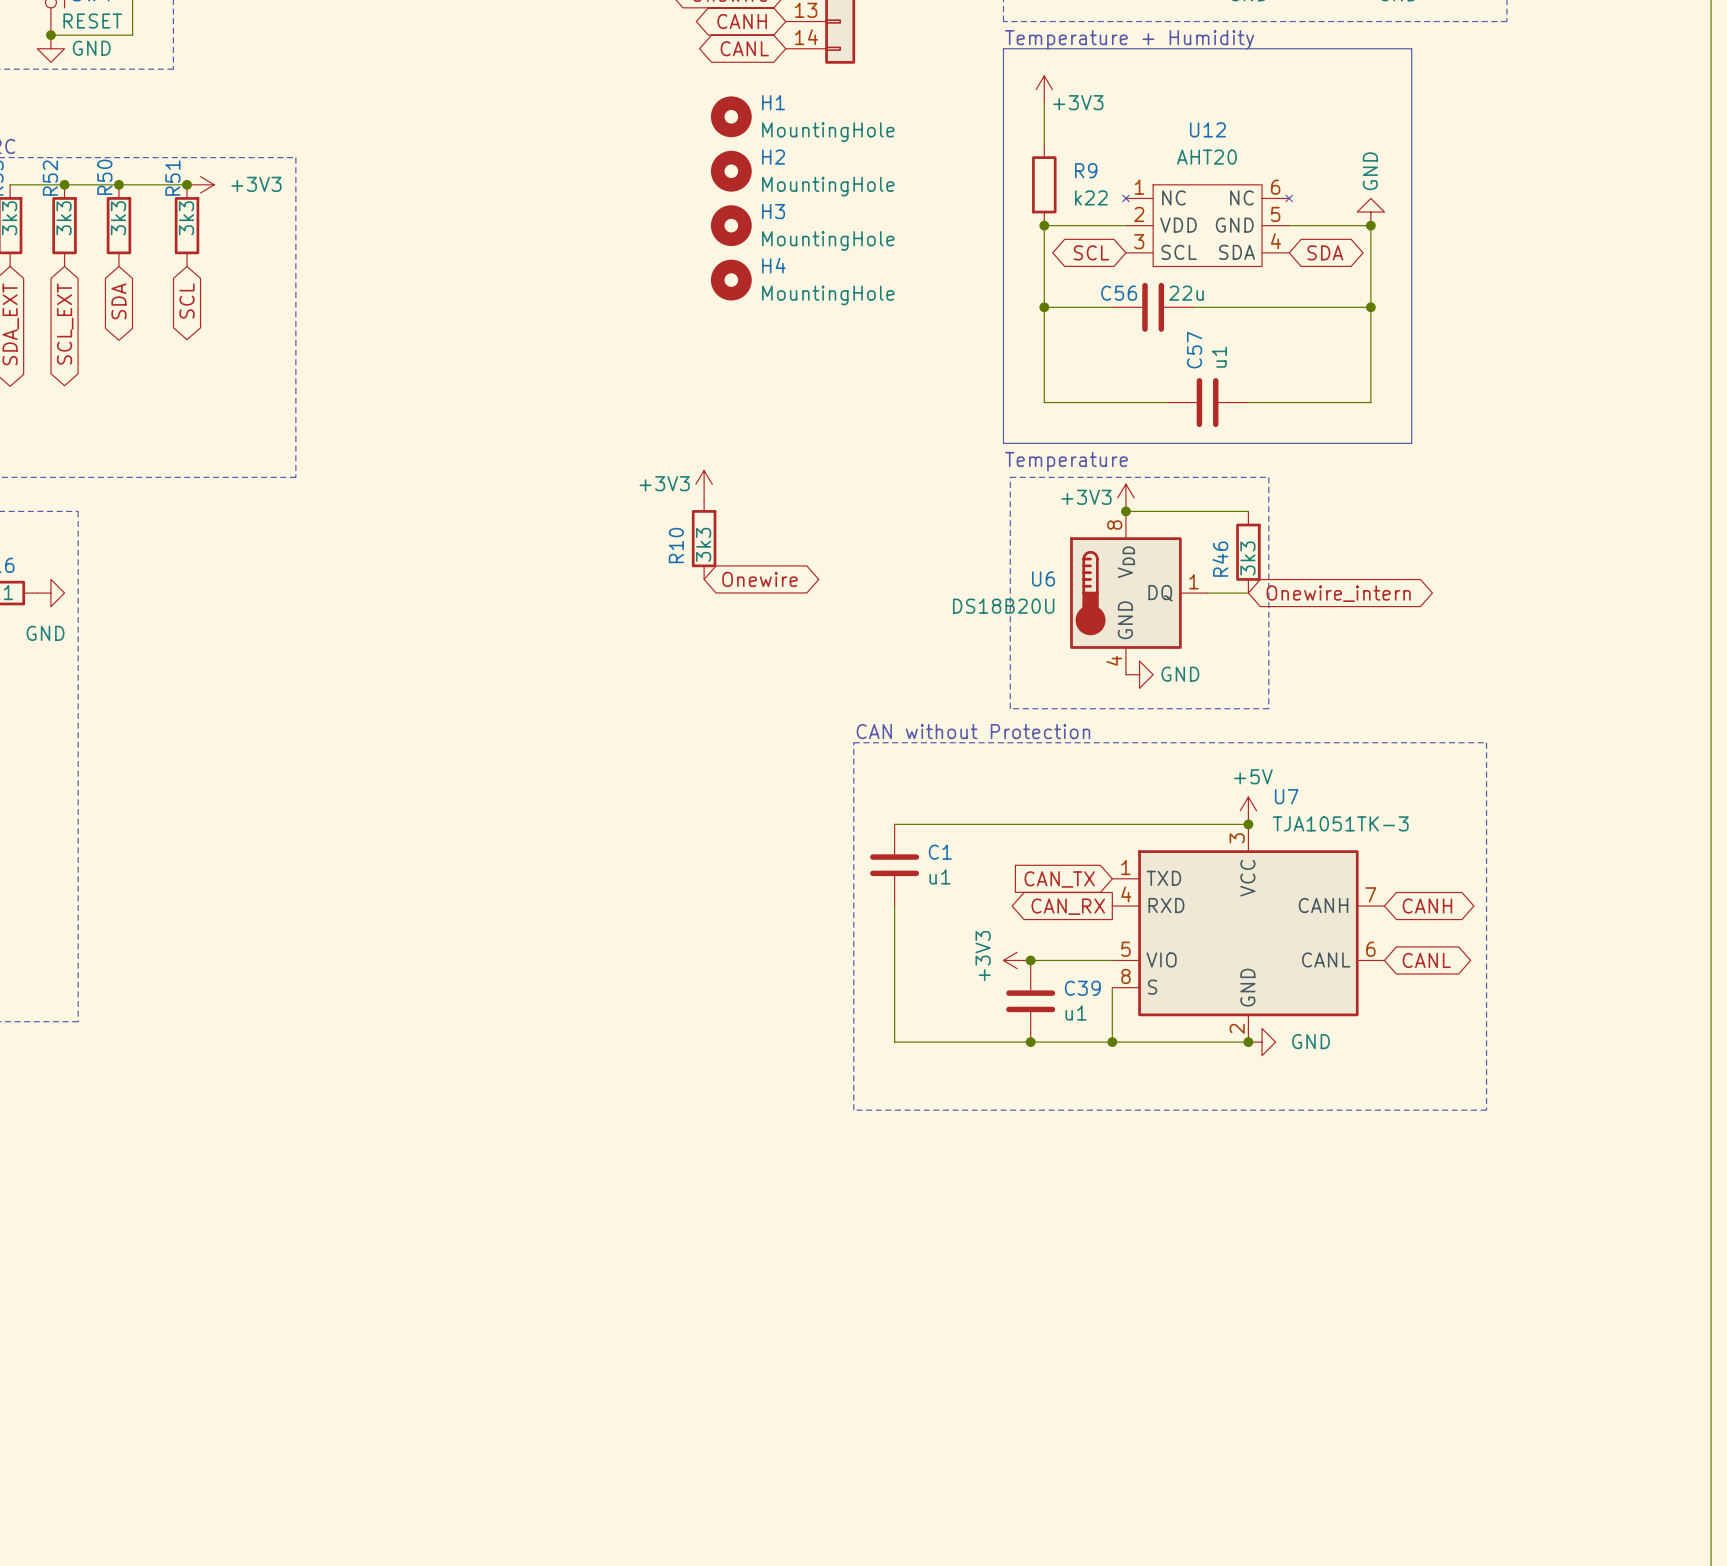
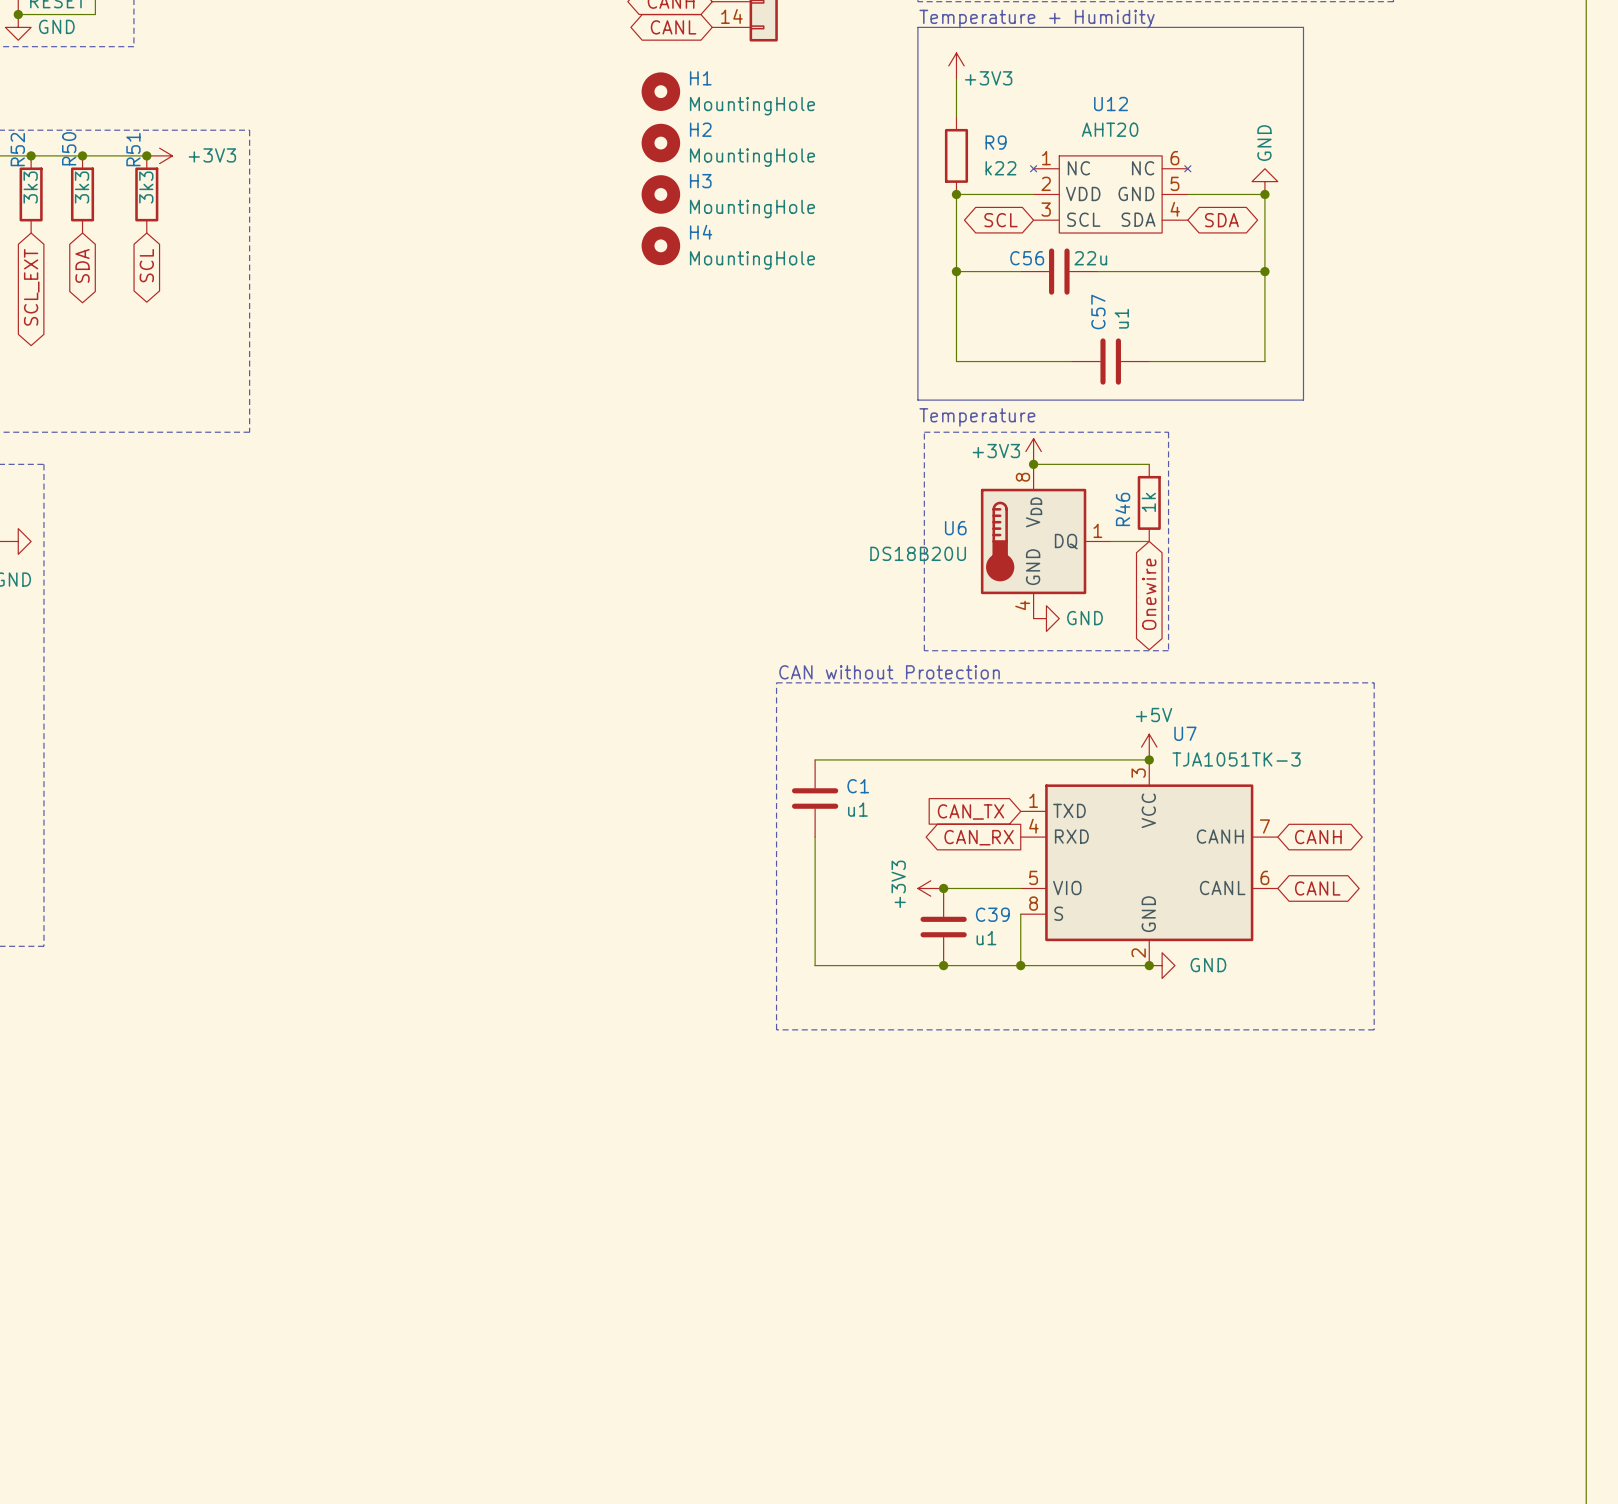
power symbol: +3V3 (704, 484) -> none
R10: 3k3 (704, 538) -> none
R46 value: 3k3 (1247, 558) -> 1k (1148, 502)
global label: Onewire (760, 579) -> none
global label: Onewire_intern (1338, 593) -> Onewire (1149, 594)

